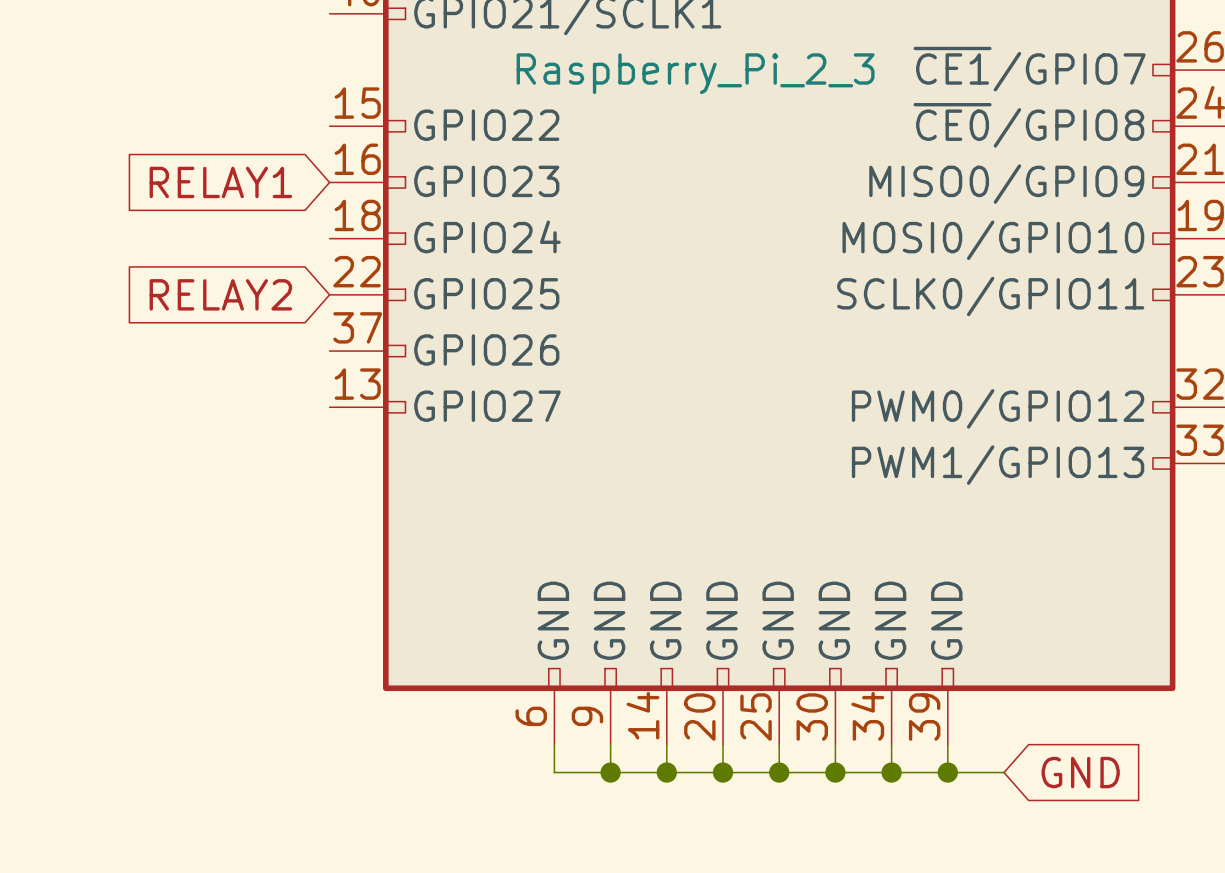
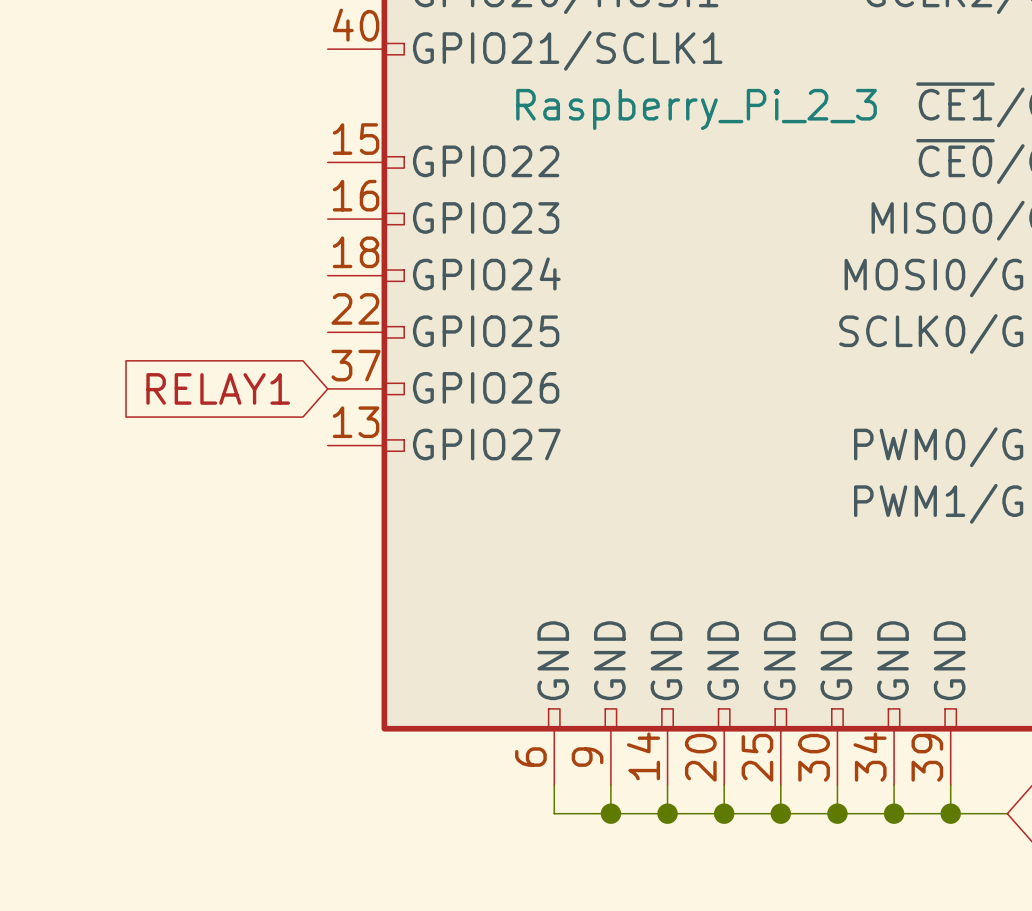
global label position: RELAY1 (220, 182) -> RELAY1 (218, 388)
global label: RELAY2 (220, 294) -> none

